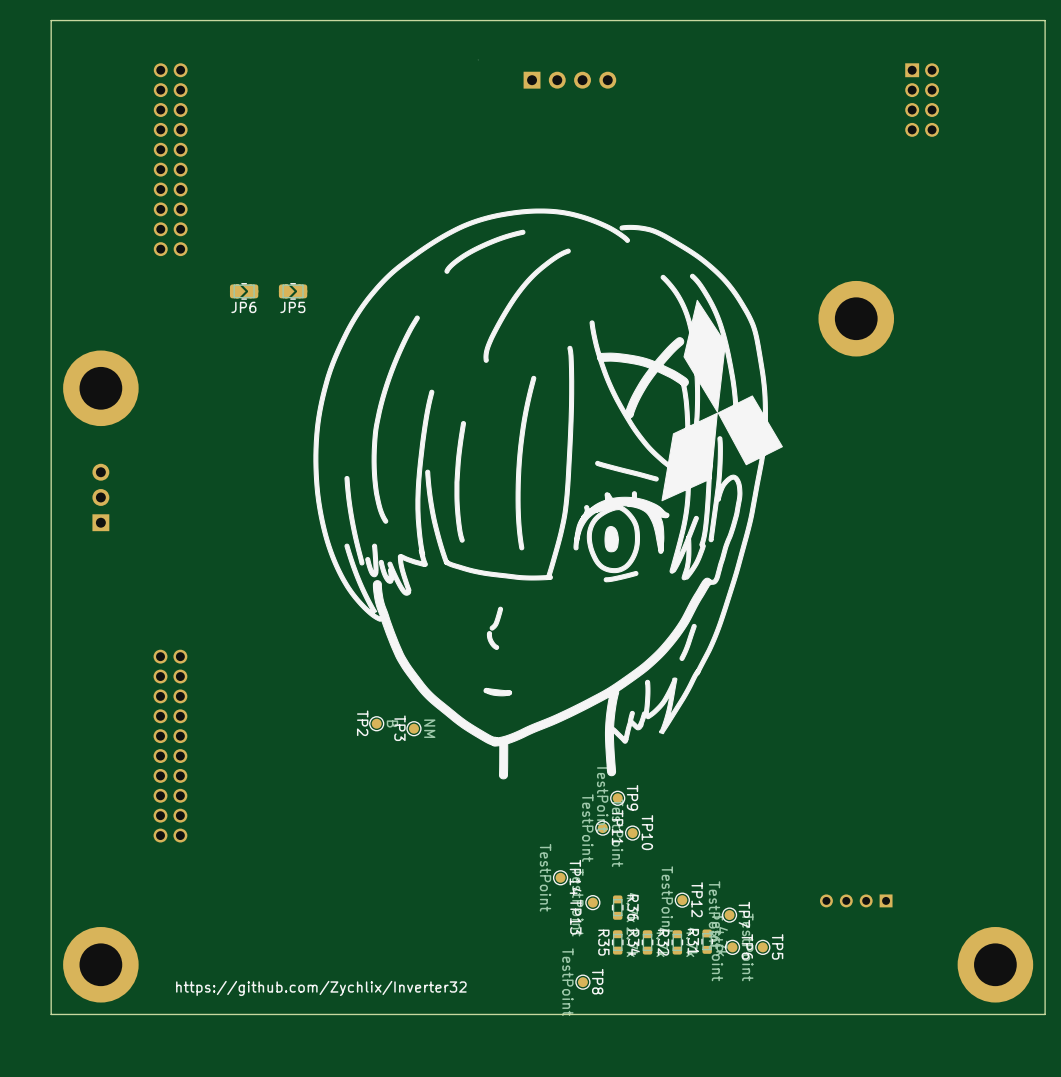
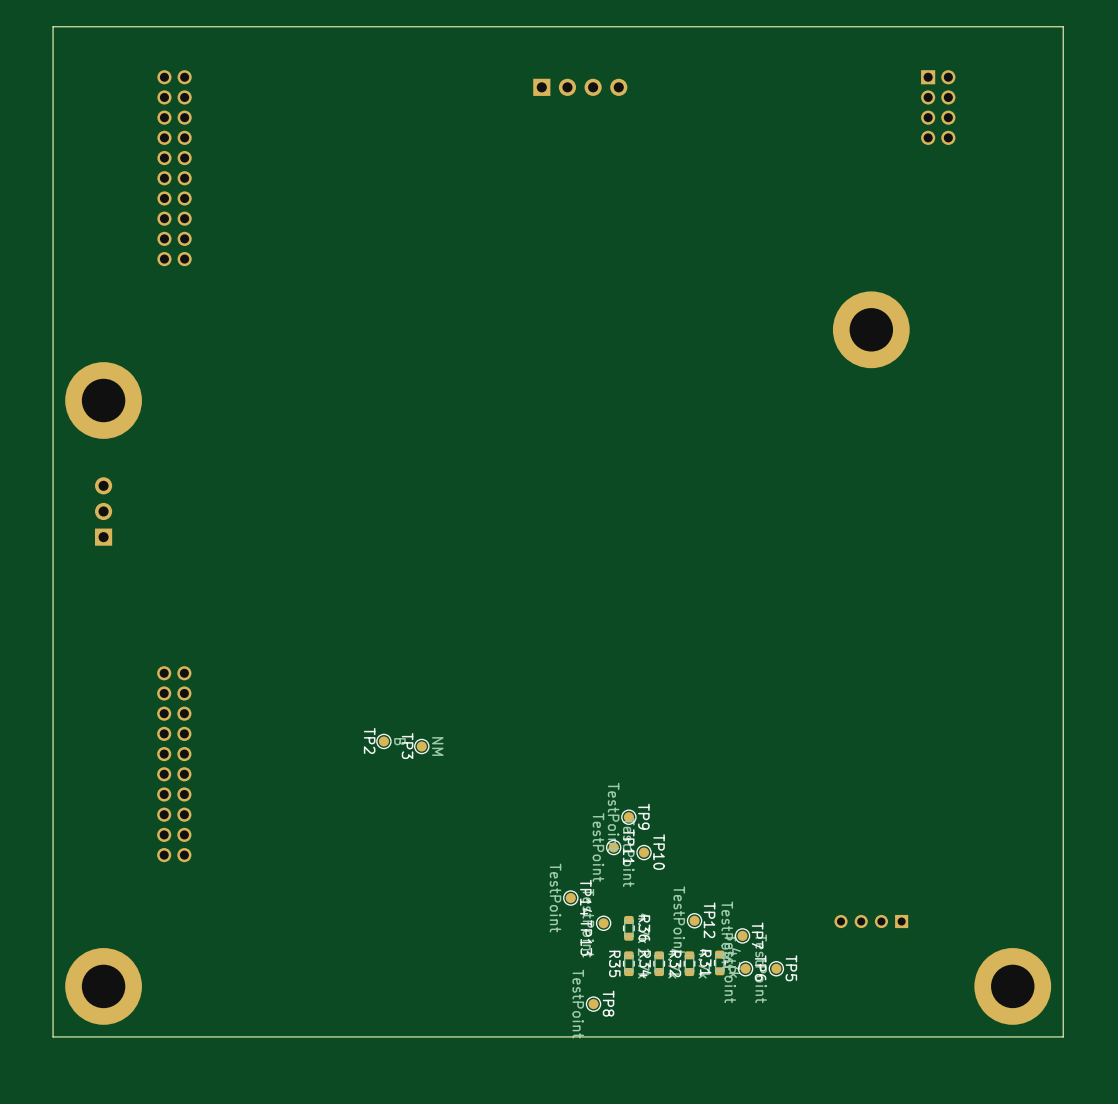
drawing: [313, 208, 783, 780] -> none
JP6: (244, 291) -> none
JP5: (293, 291) -> none
text: https://github.com/Zychlix/Inverter32 (321, 988) -> none

